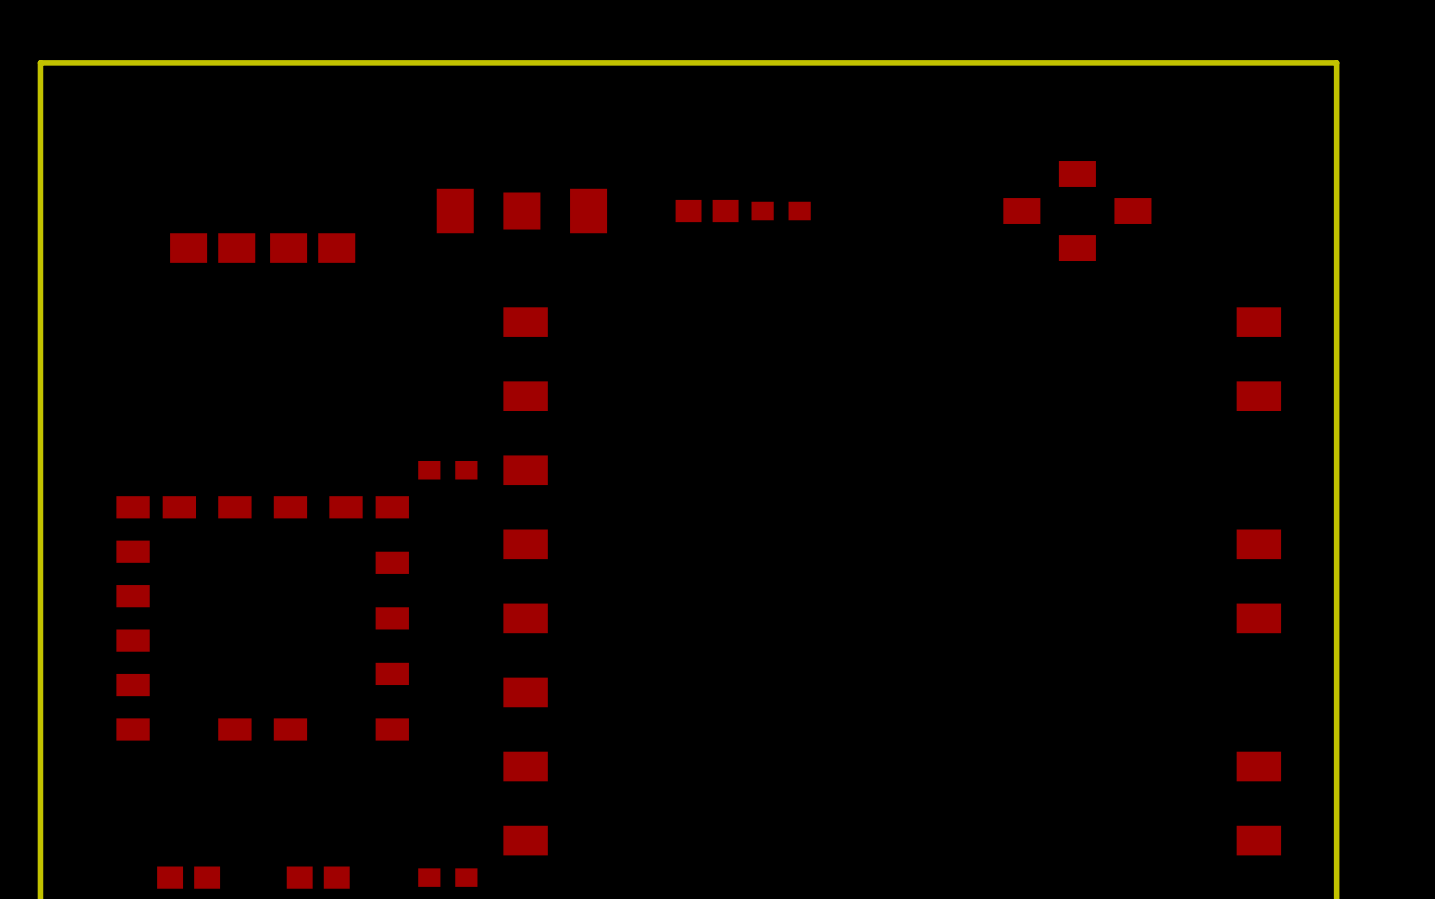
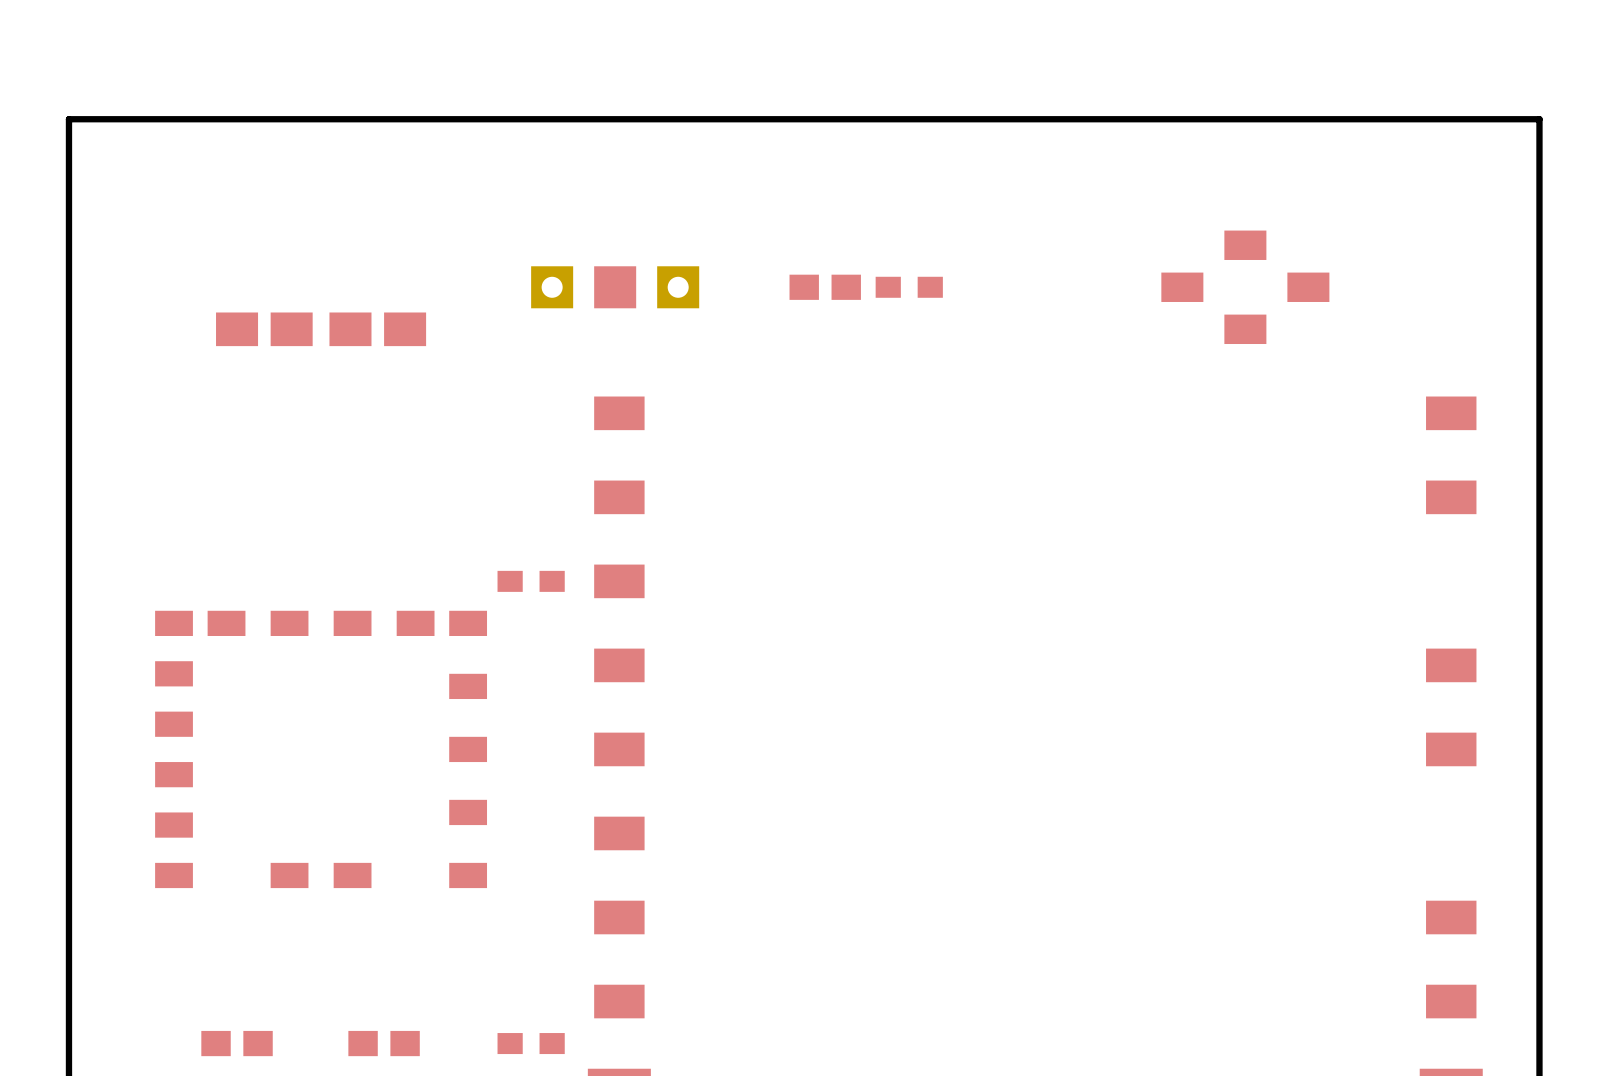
part footprint: [436, 188, 608, 234] -> [531, 266, 700, 309]

